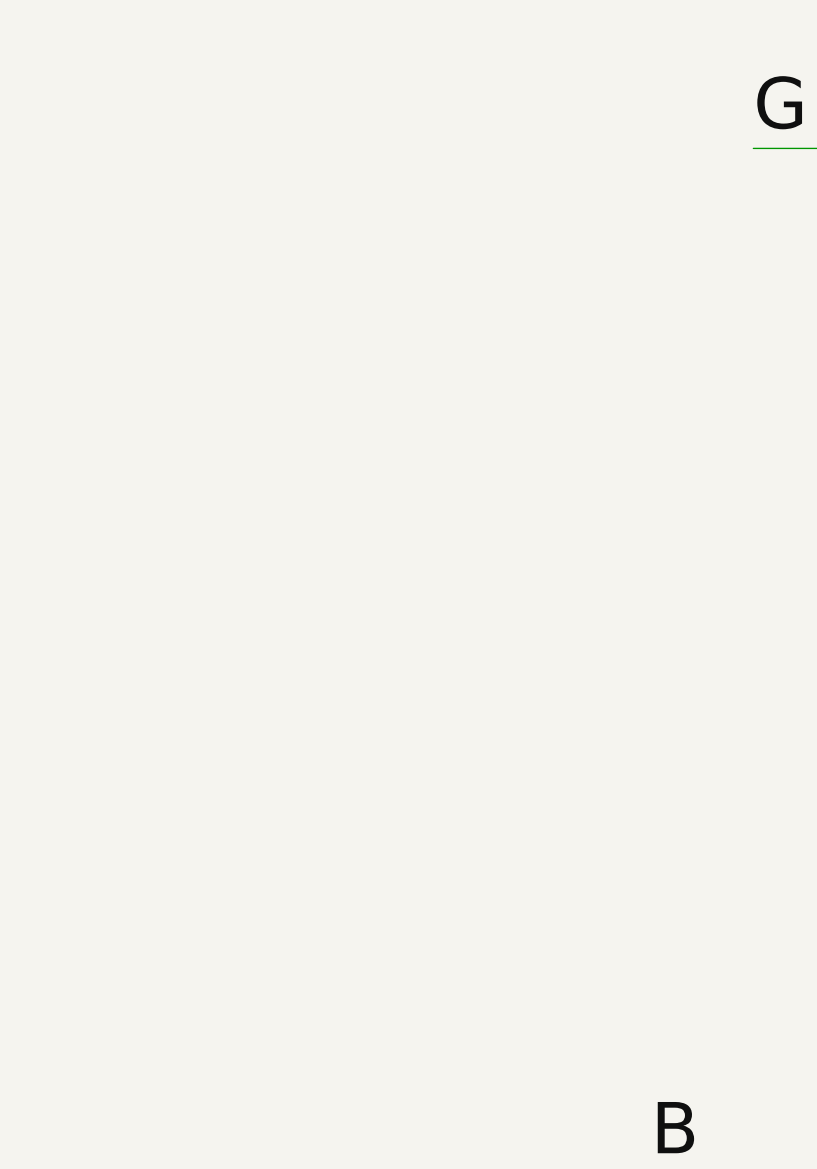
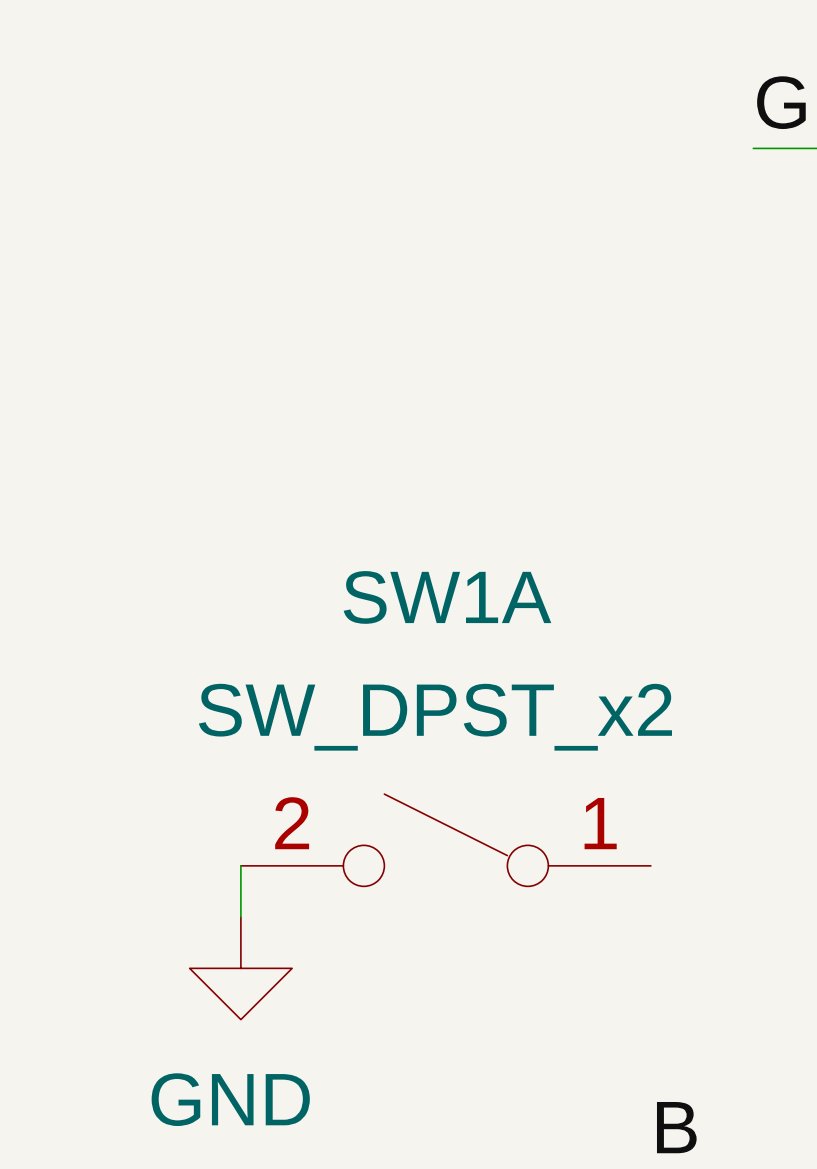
SW1A: none -> SW_DPST_x2 (445, 840)
wire: none -> (240, 865) (240, 917)
power symbol: none -> GND (240, 968)

